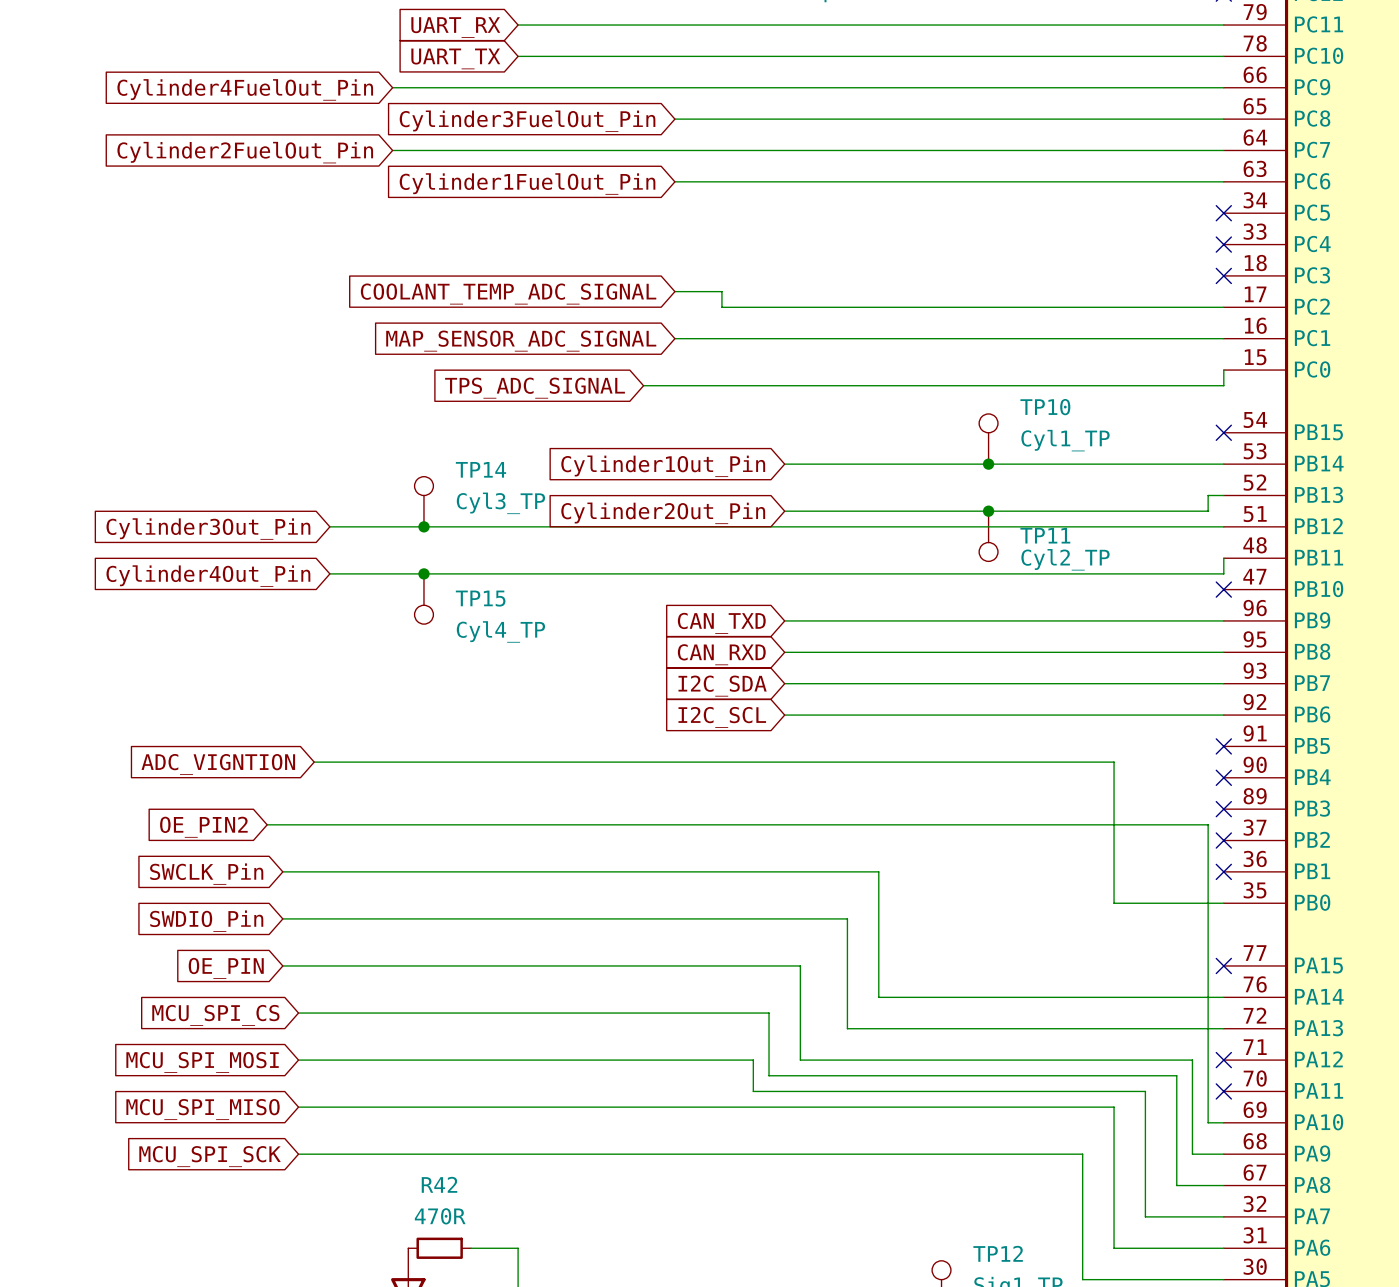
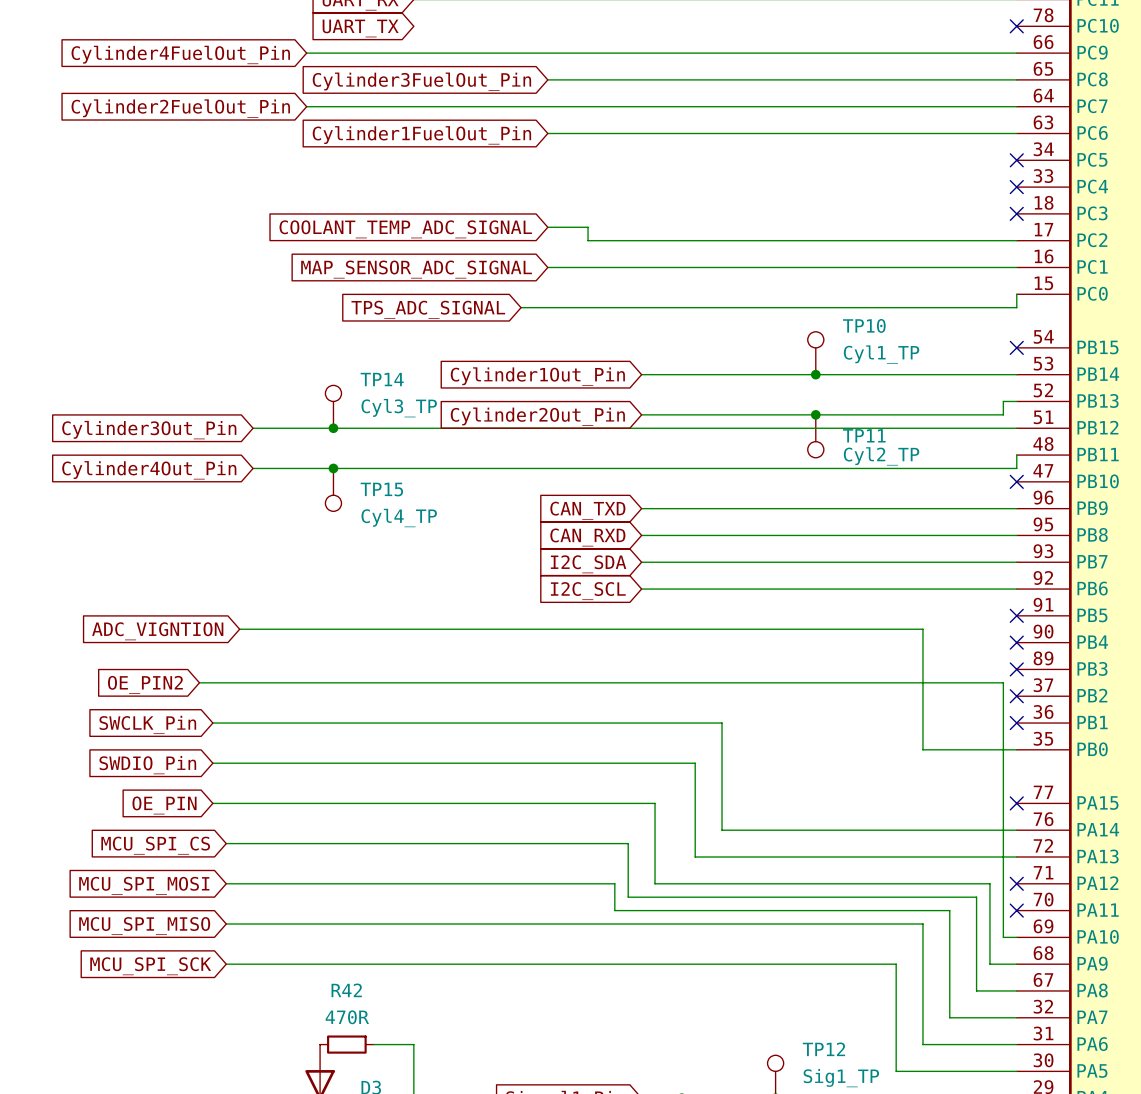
wire: (518, 56) (1223, 56) -> none
no-connect mark: none -> (1016, 26)

